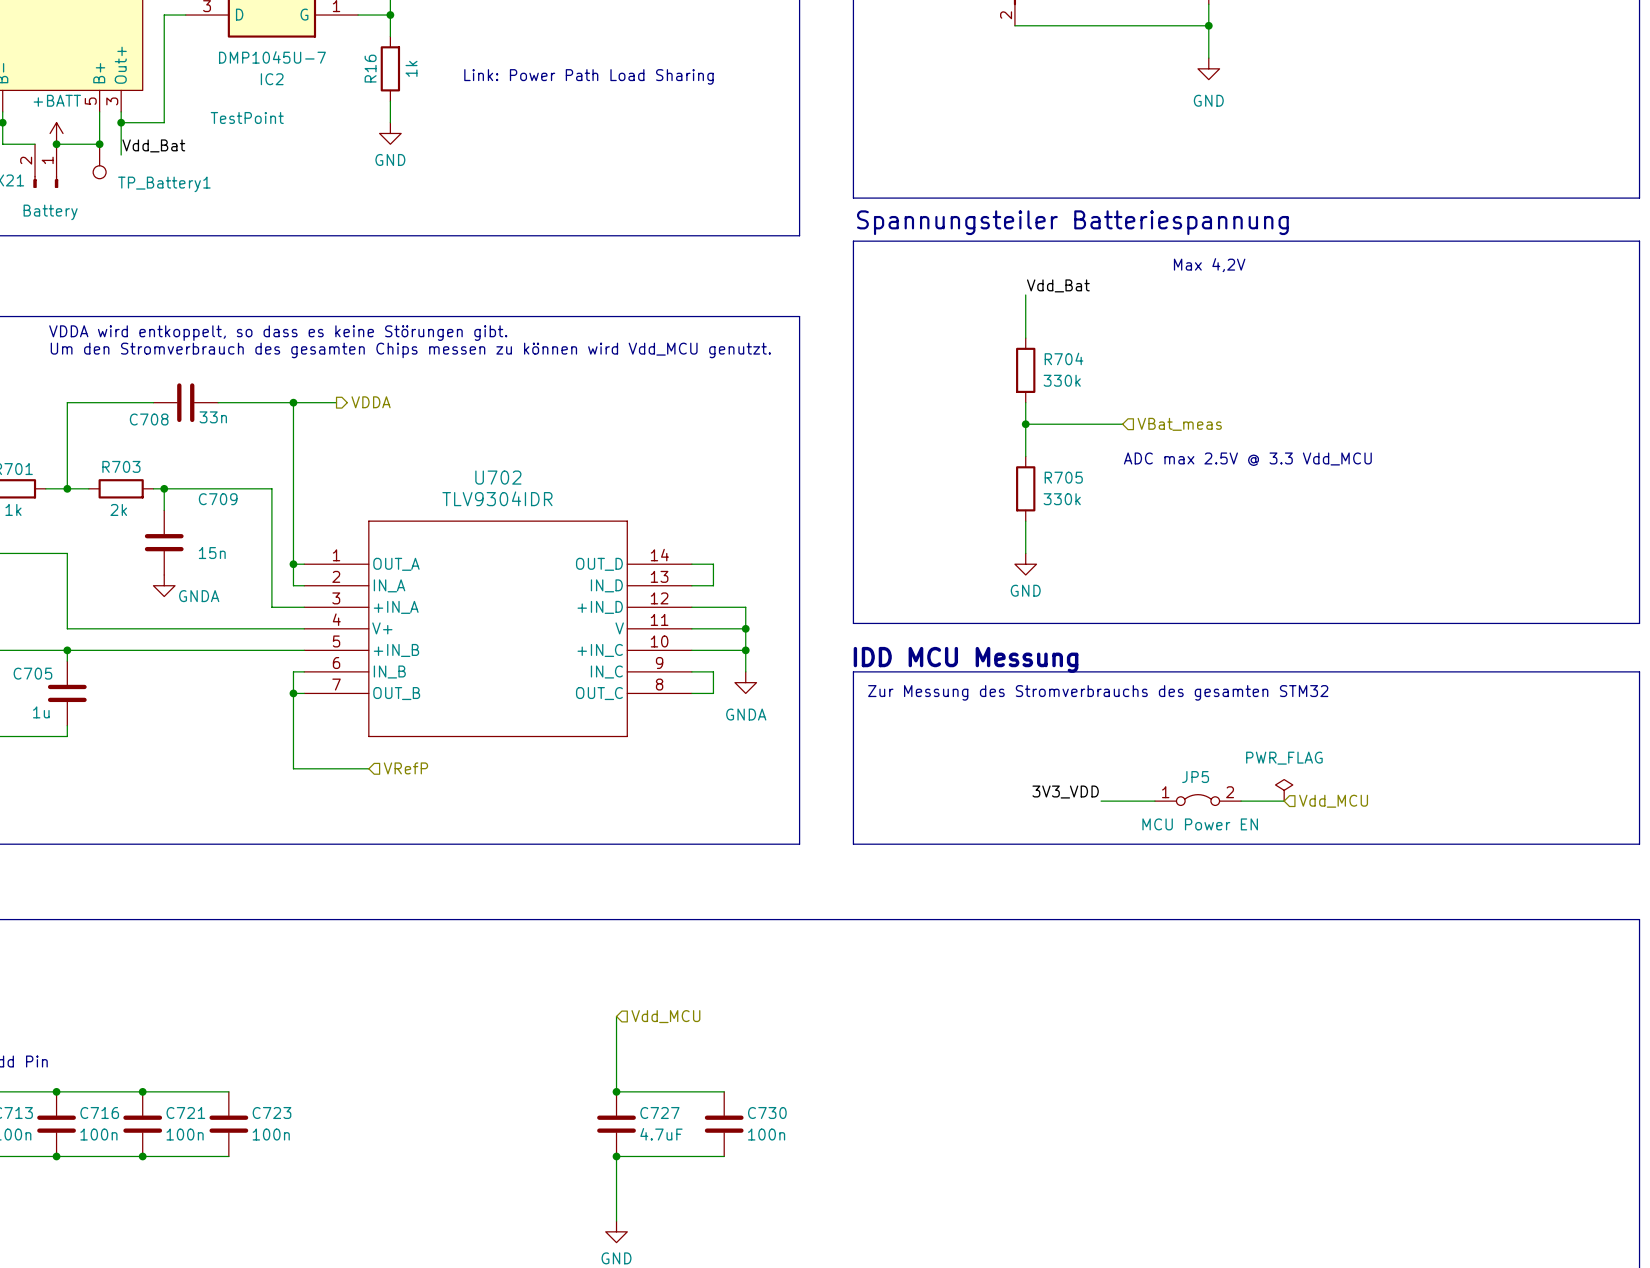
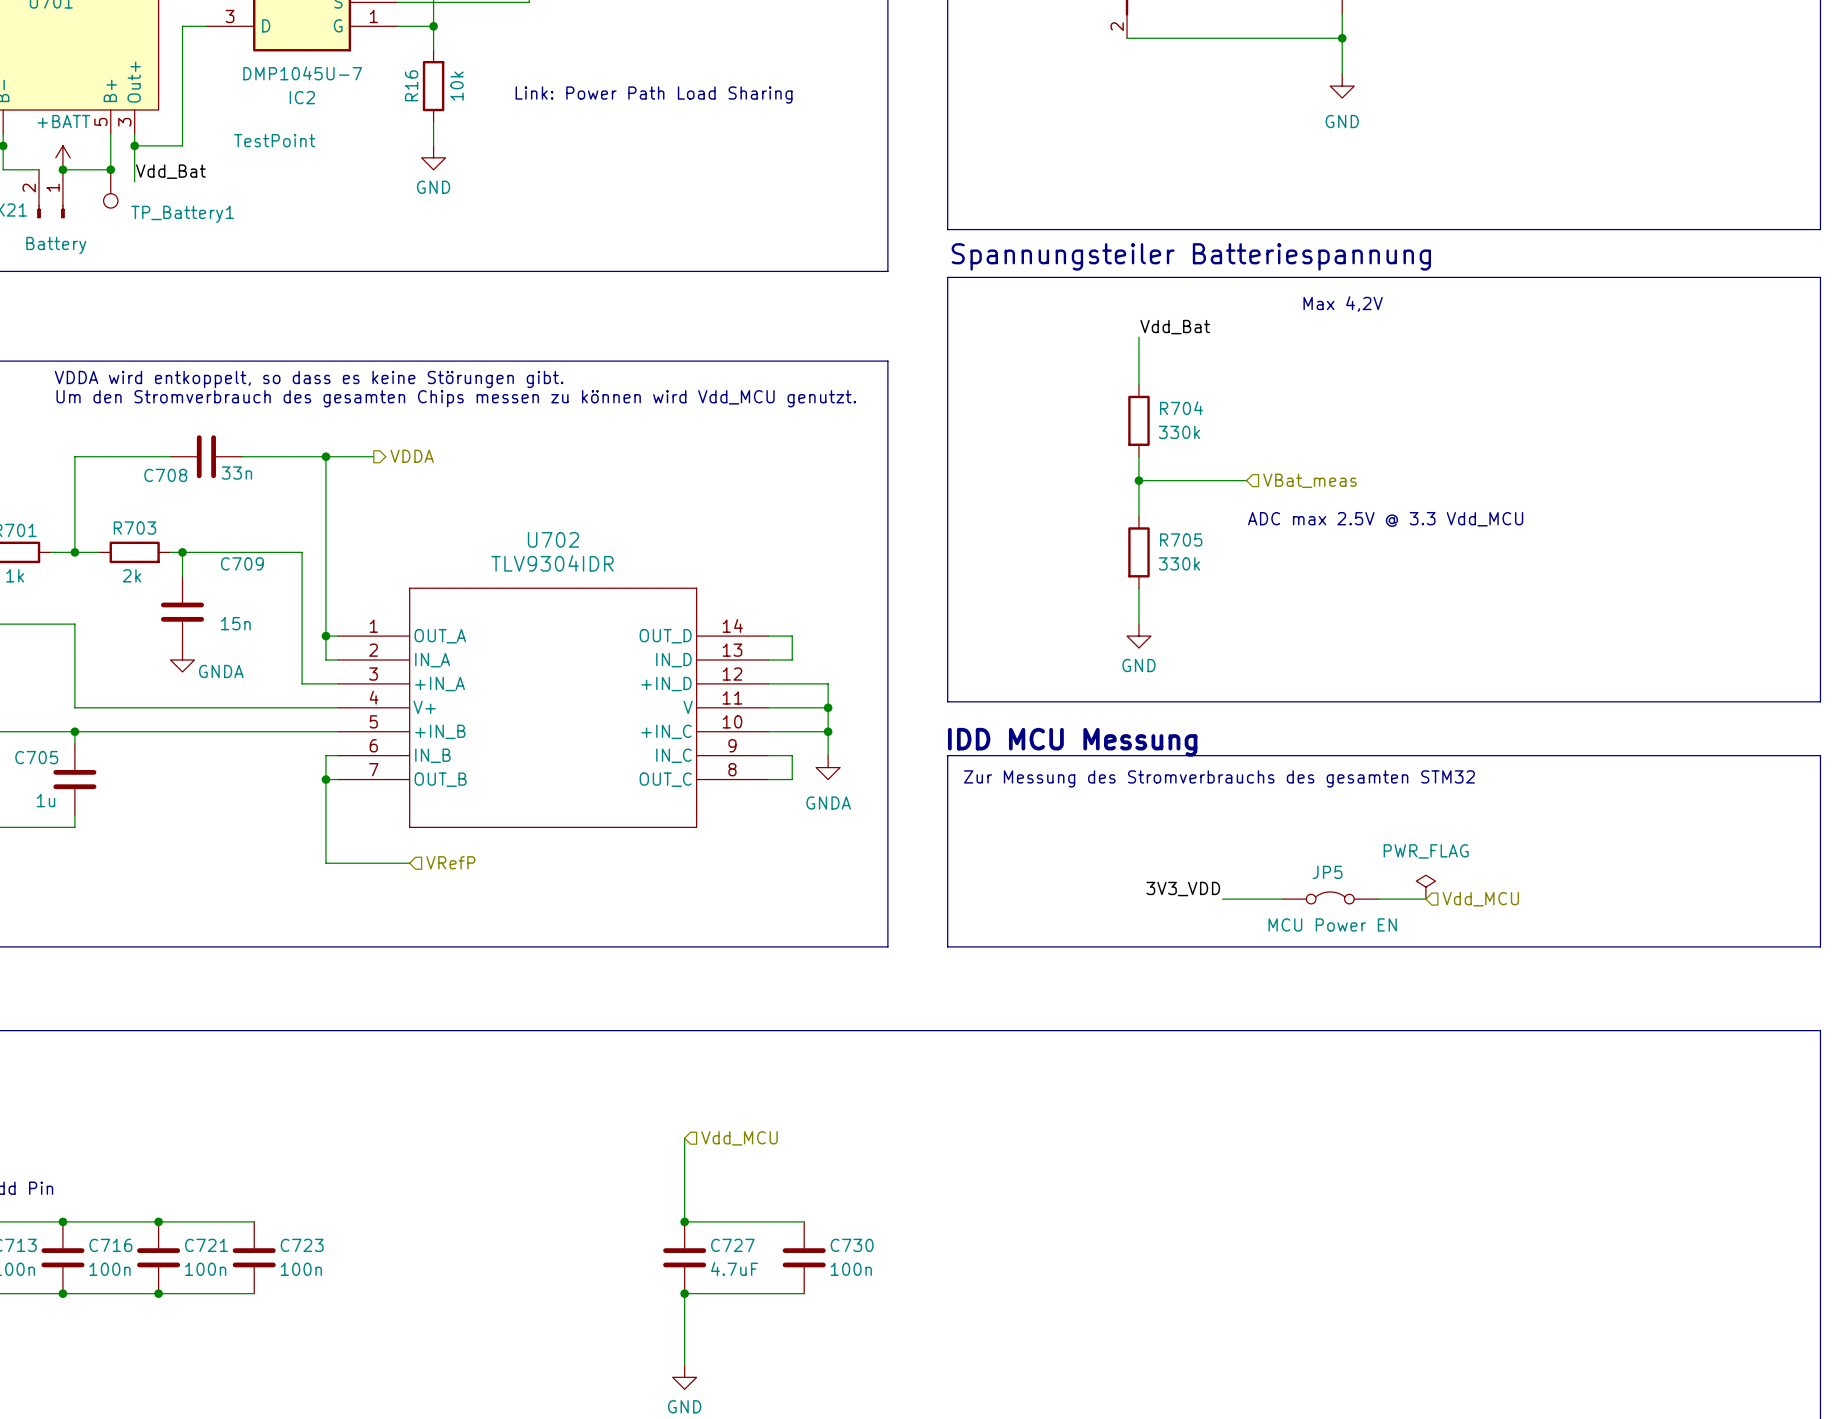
R16 value: 1k (411, 68) -> 10k (457, 86)
JP5 pin number: 1 (1165, 792) -> none
JP5 pin number: 2 (1230, 792) -> none

